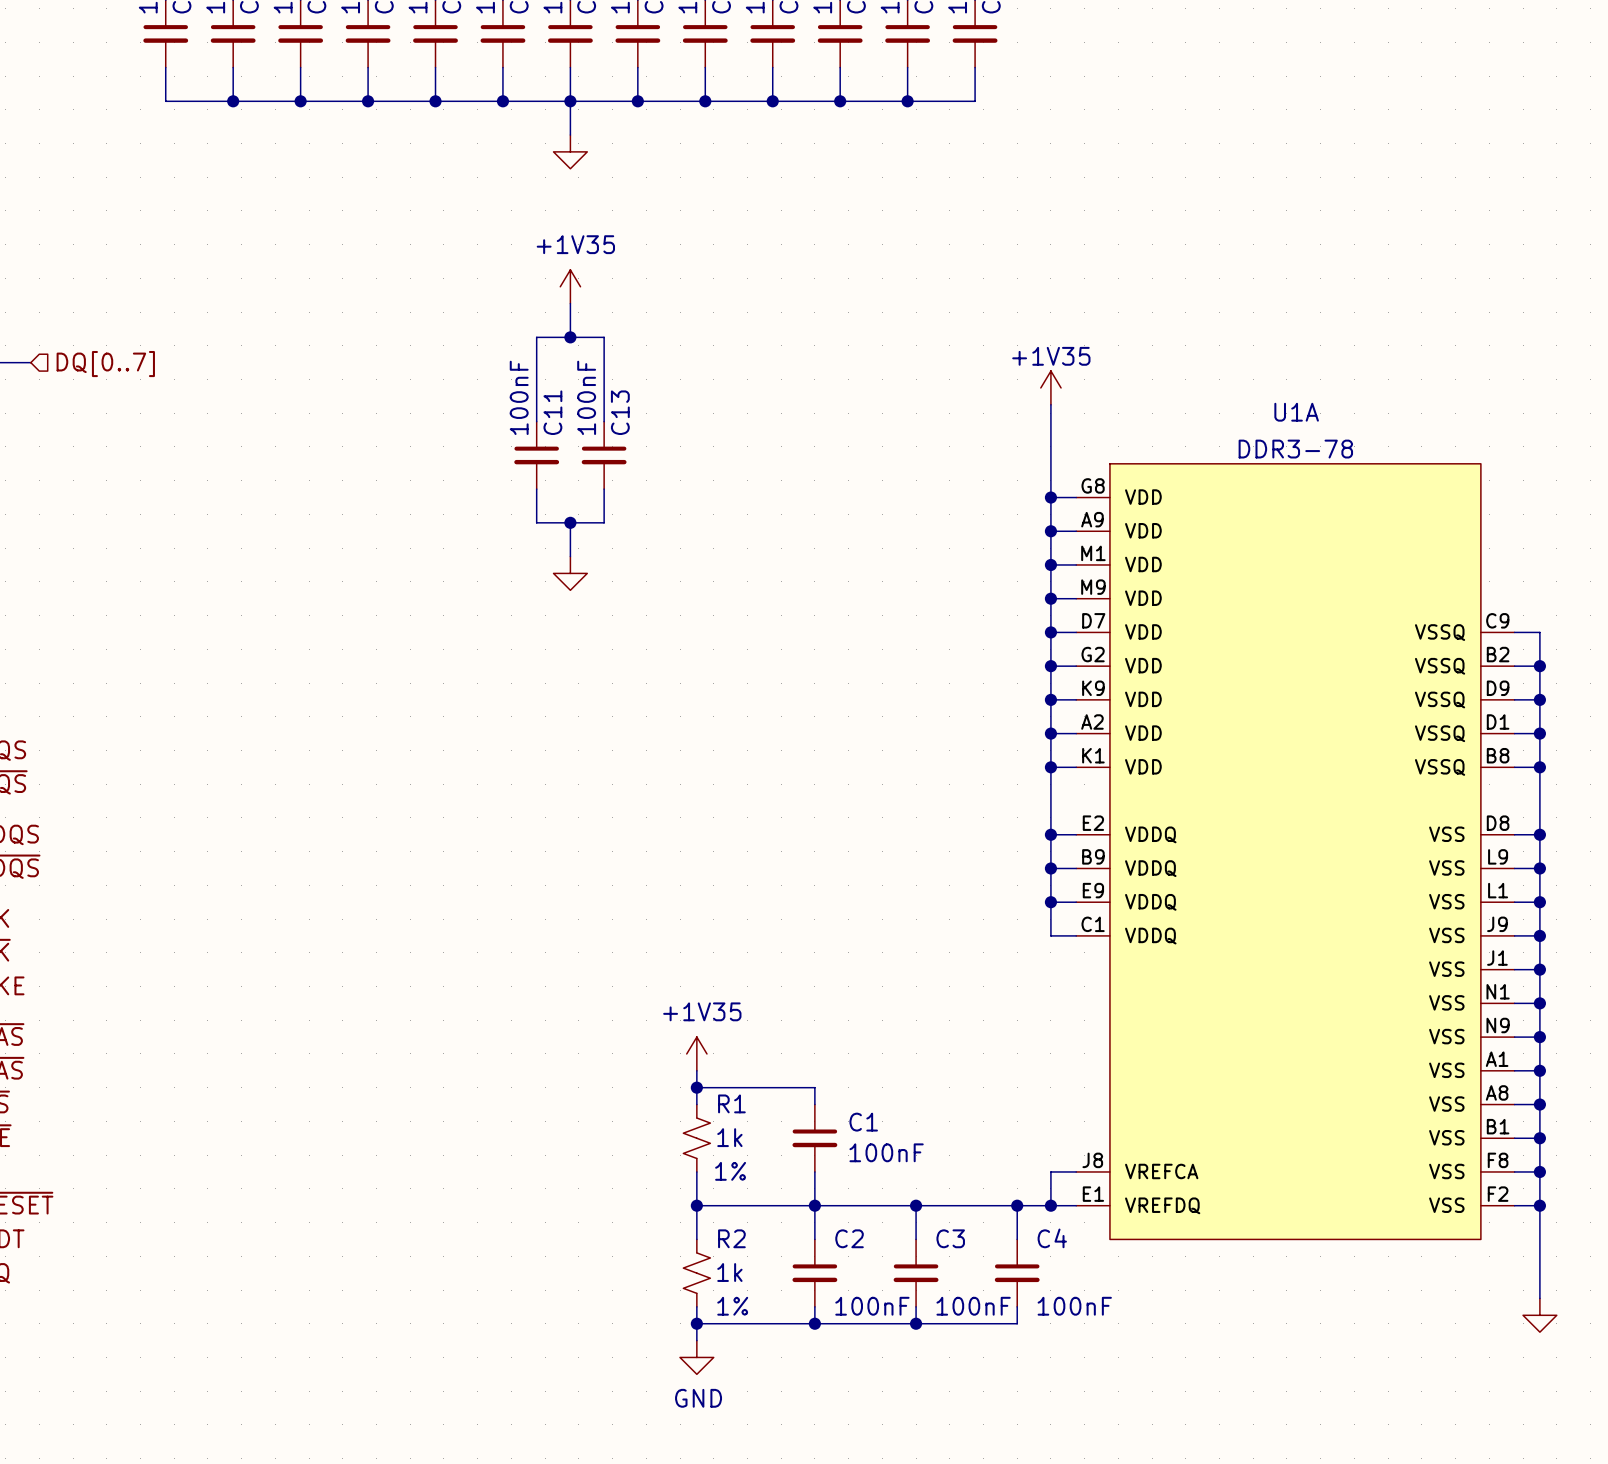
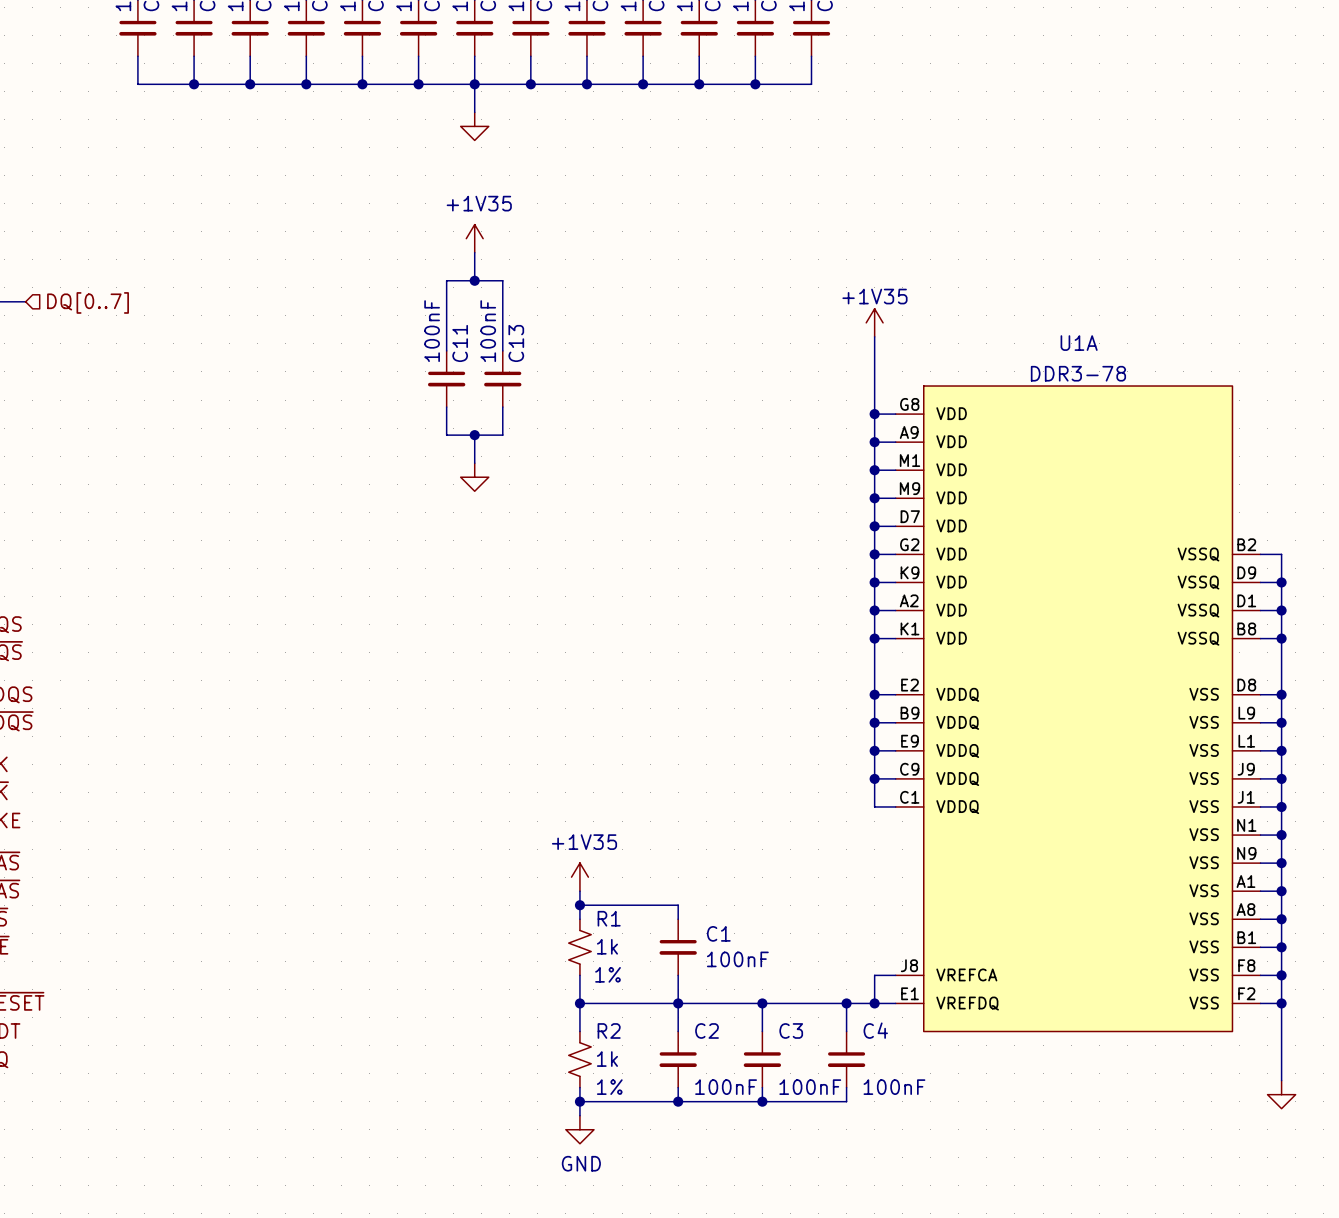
U1A symbol: [1076, 463, 1515, 1240] -> [895, 386, 1261, 1032]
wire: (1514, 632) (1539, 632) (1539, 666) -> none
junction: (1539, 666) -> none
wire: none -> (874, 778) (874, 806) (895, 806)
junction: none -> (874, 778)

